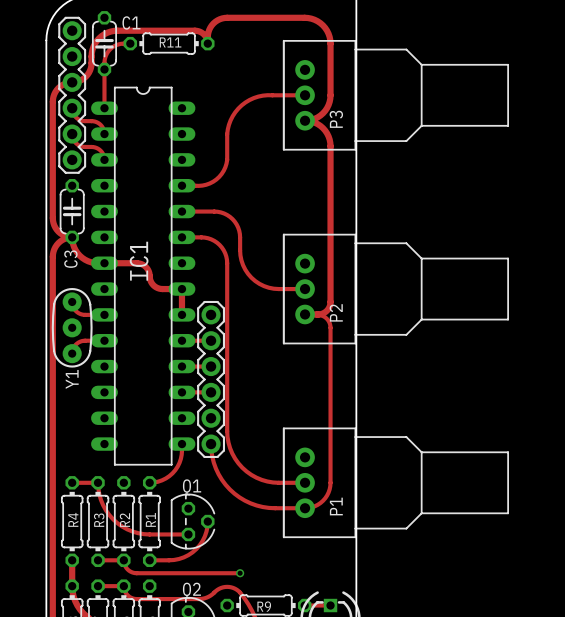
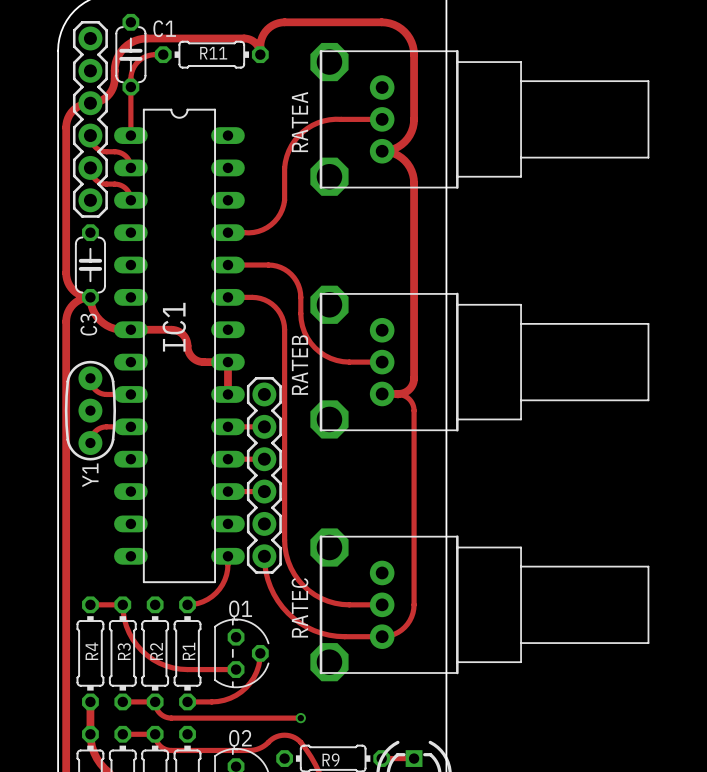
RATEA: none -> (479, 119)
P3: (395, 95) -> none
RATEB: none -> (479, 362)
P2: (395, 289) -> none
RATEC: none -> (479, 604)
P1: (395, 482) -> none

